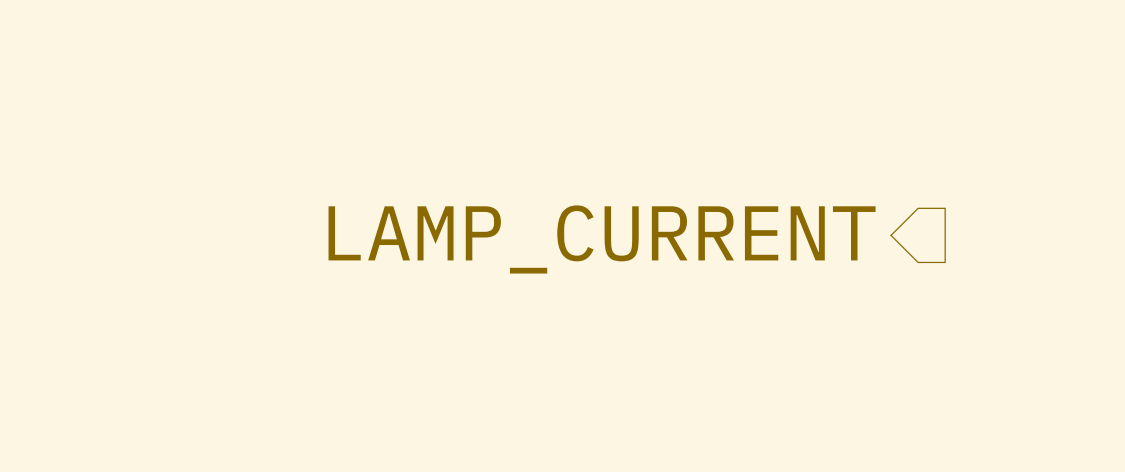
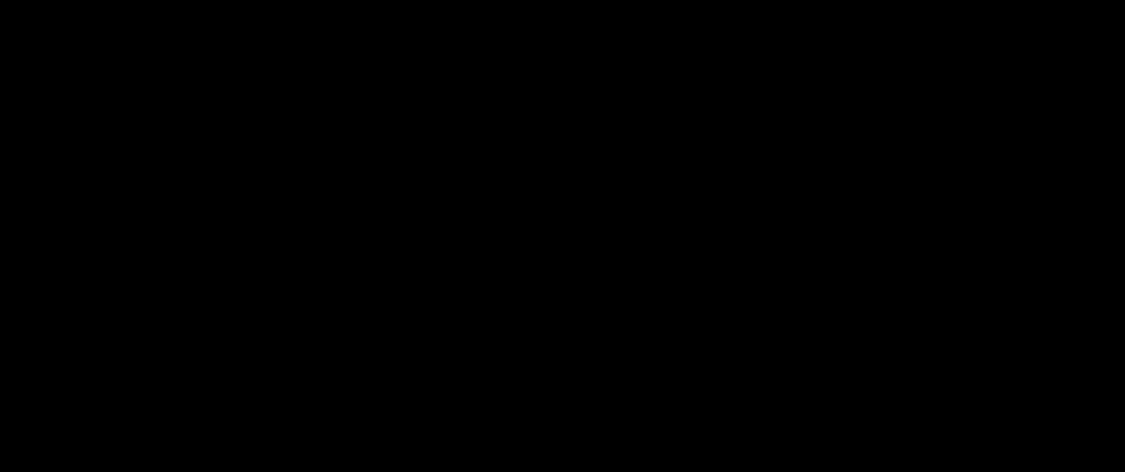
hierarchical label: LAMP_CURRENT (602, 239) -> none

